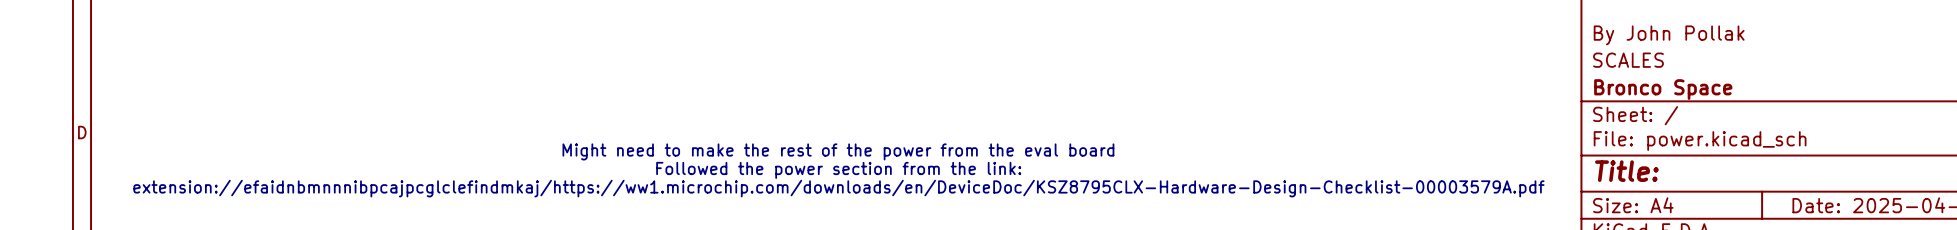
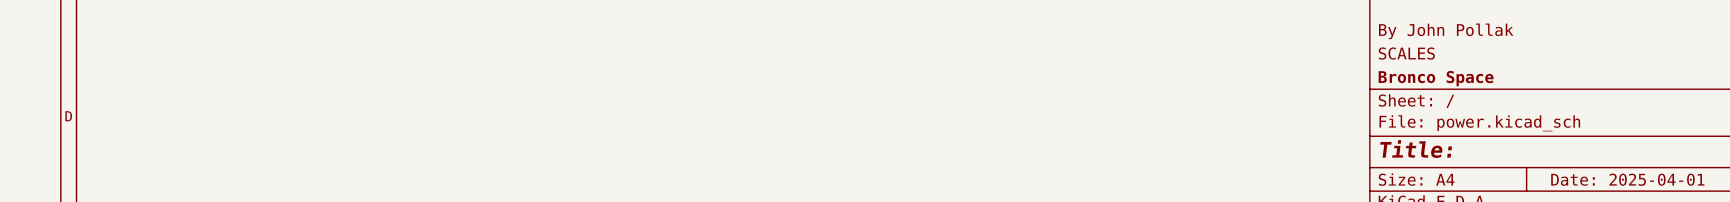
text: Might need to make the rest of the power from the eval board (838, 151) -> none
text: Followed the power section from the link: (838, 170) -> none
text: extension://efaidnbmnnnibpcajpcglclefindmkaj/https://ww1.microchip.com/downloads/en/DeviceDoc/KSZ8795CLX-Hardware-Design-Checklist-00003579A.pdf (838, 188) -> none

